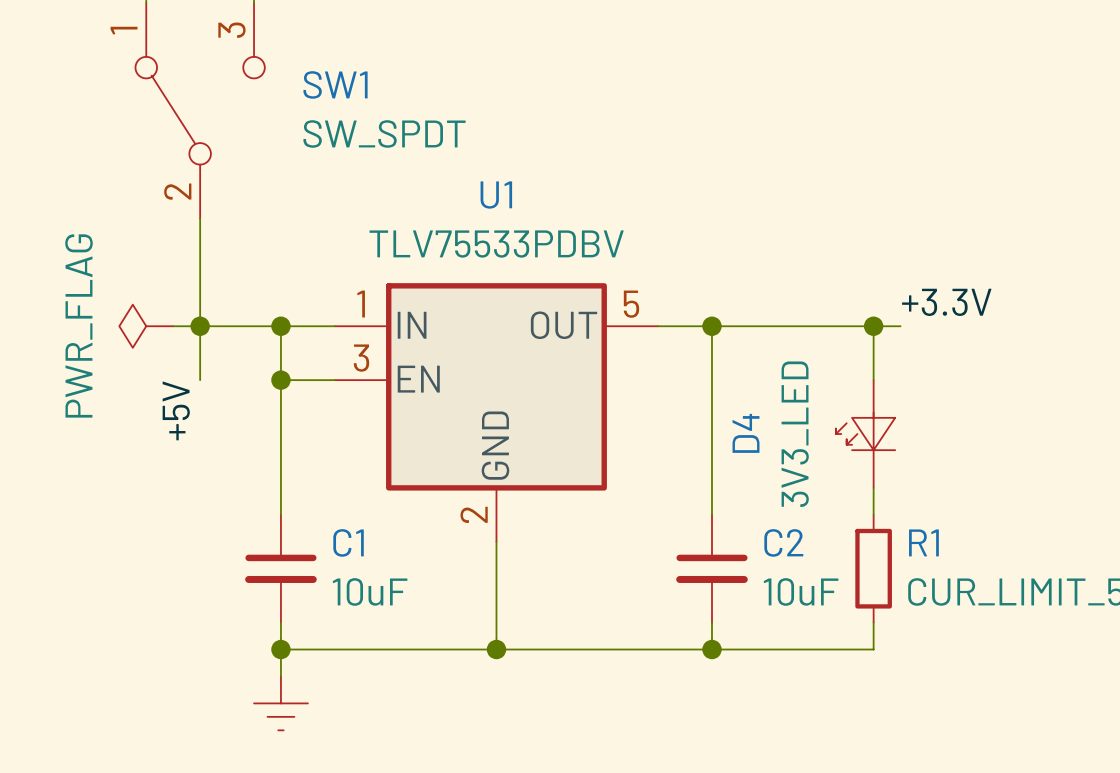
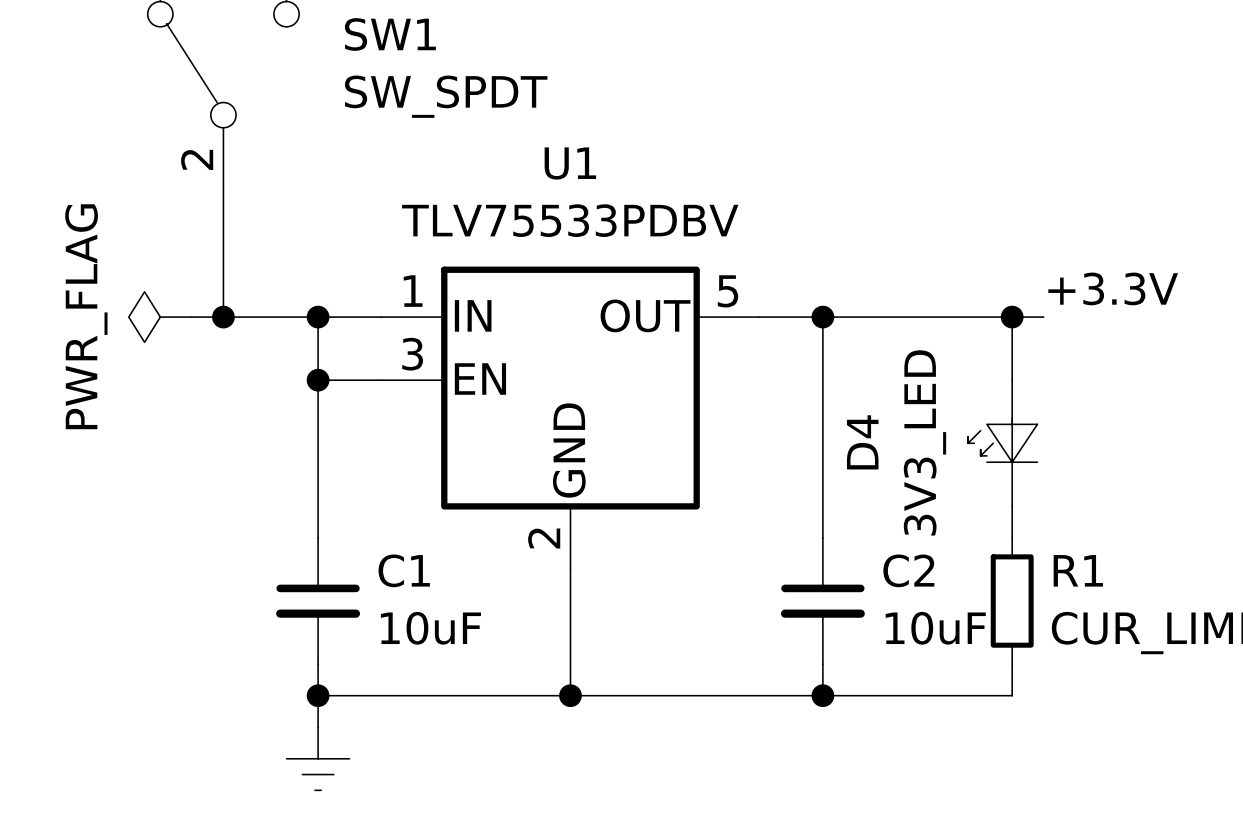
wire: (200, 326) (200, 380) -> none
label: +5V (176, 410) -> none

